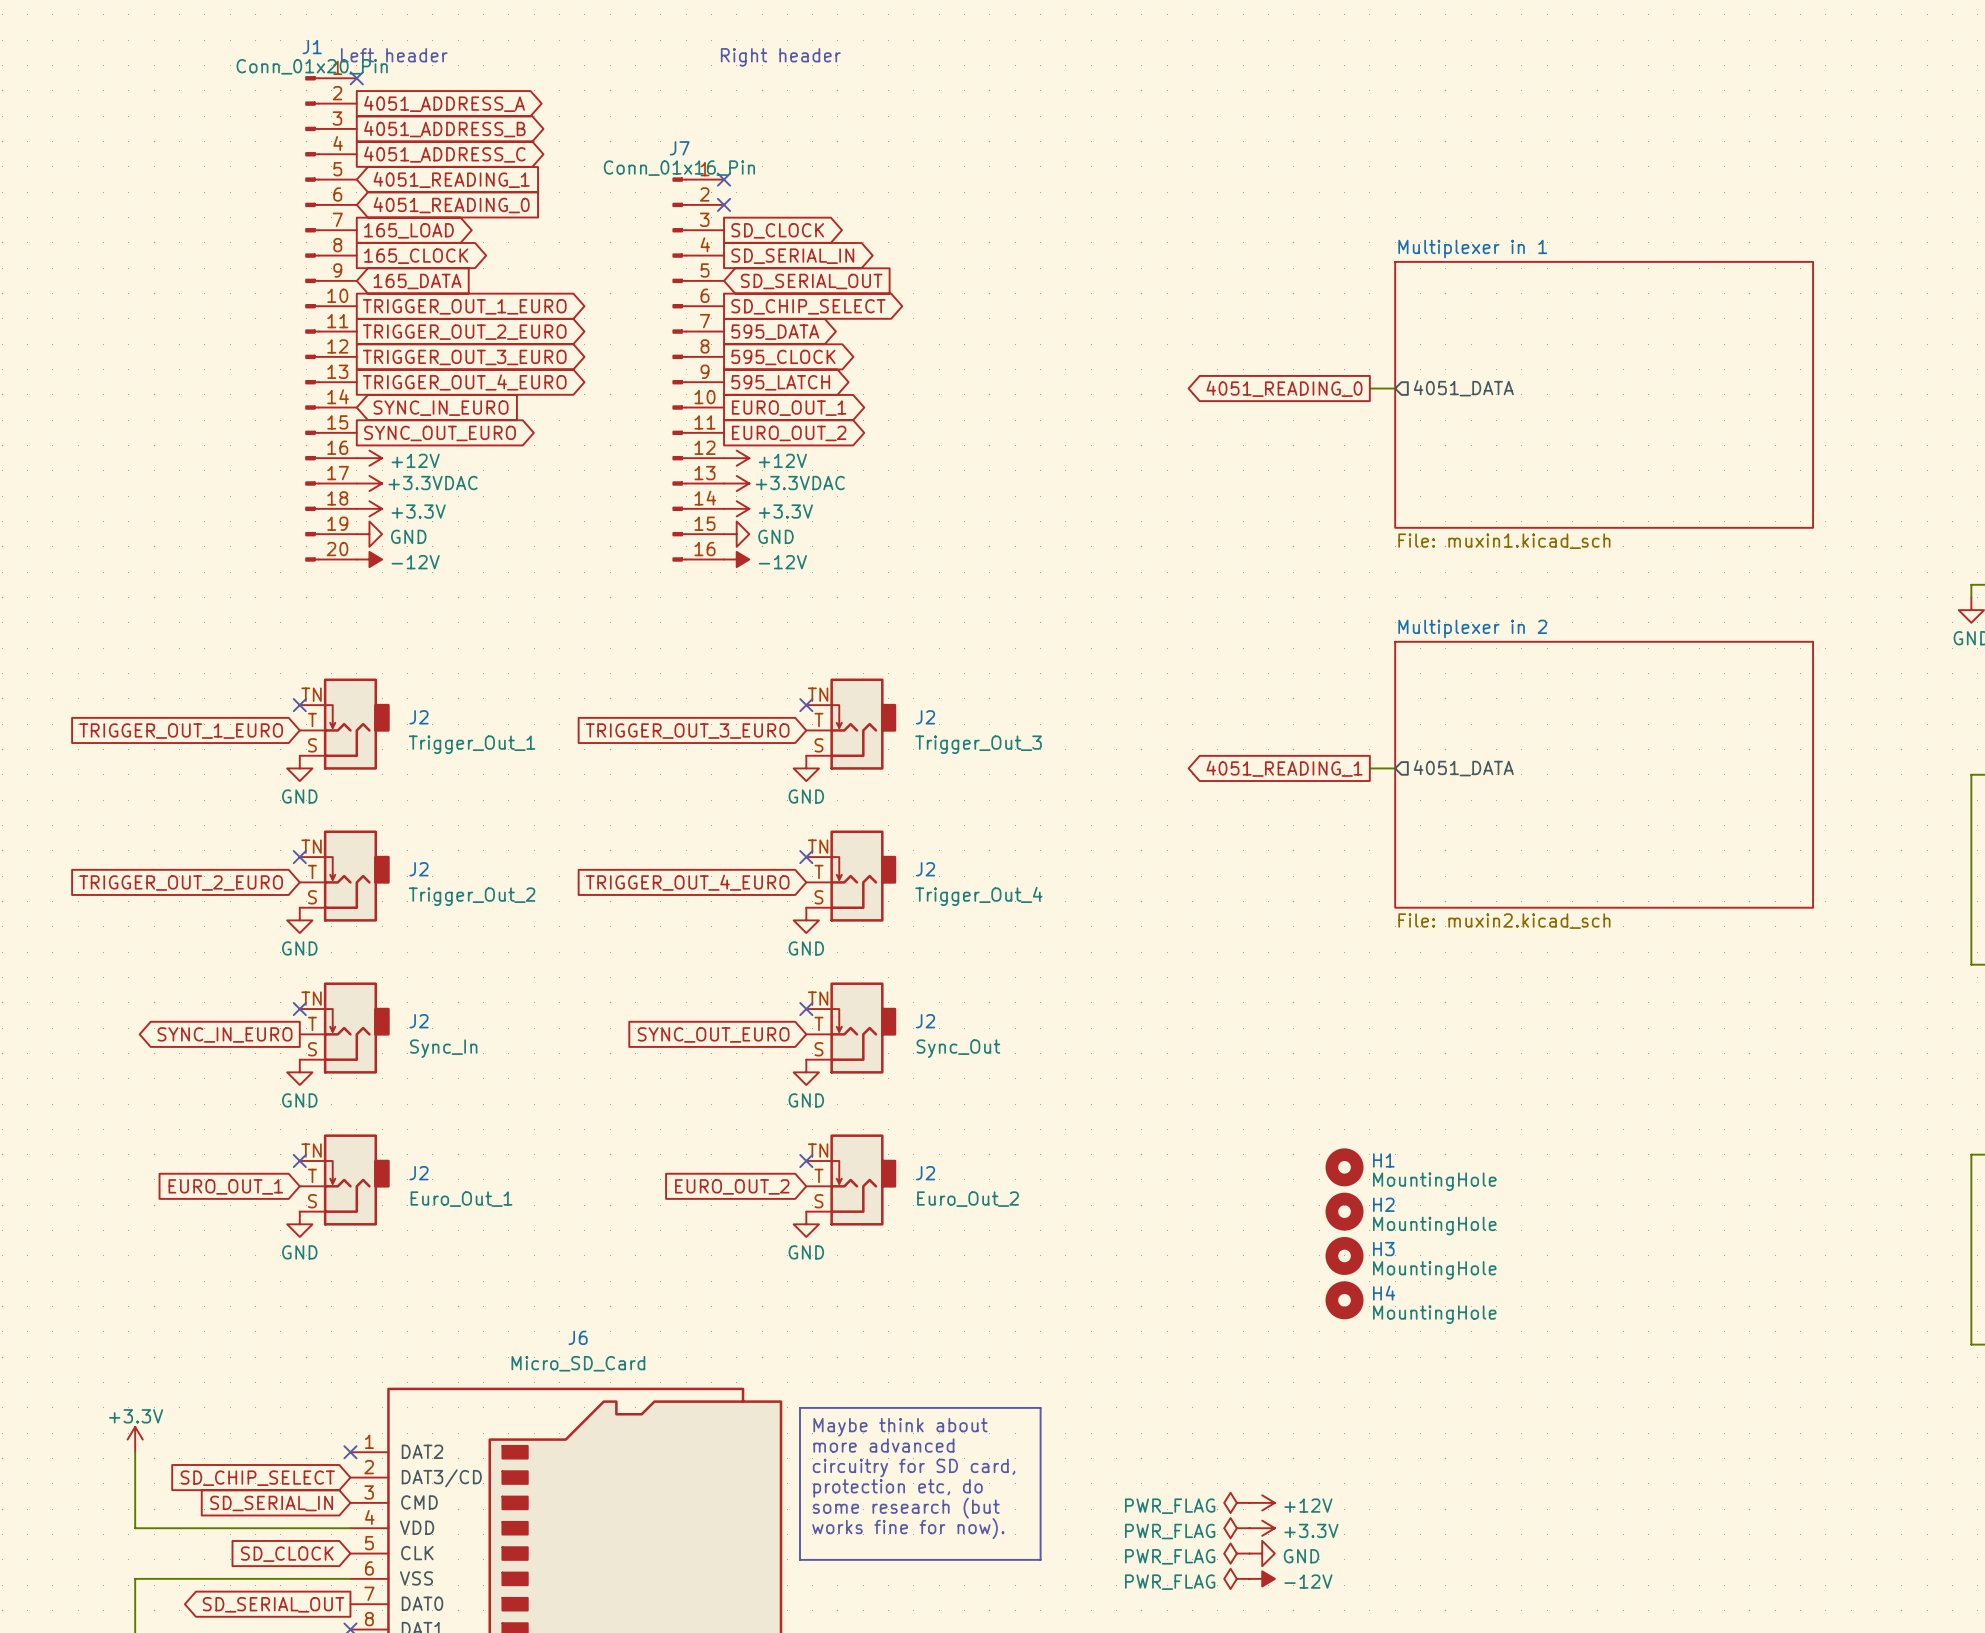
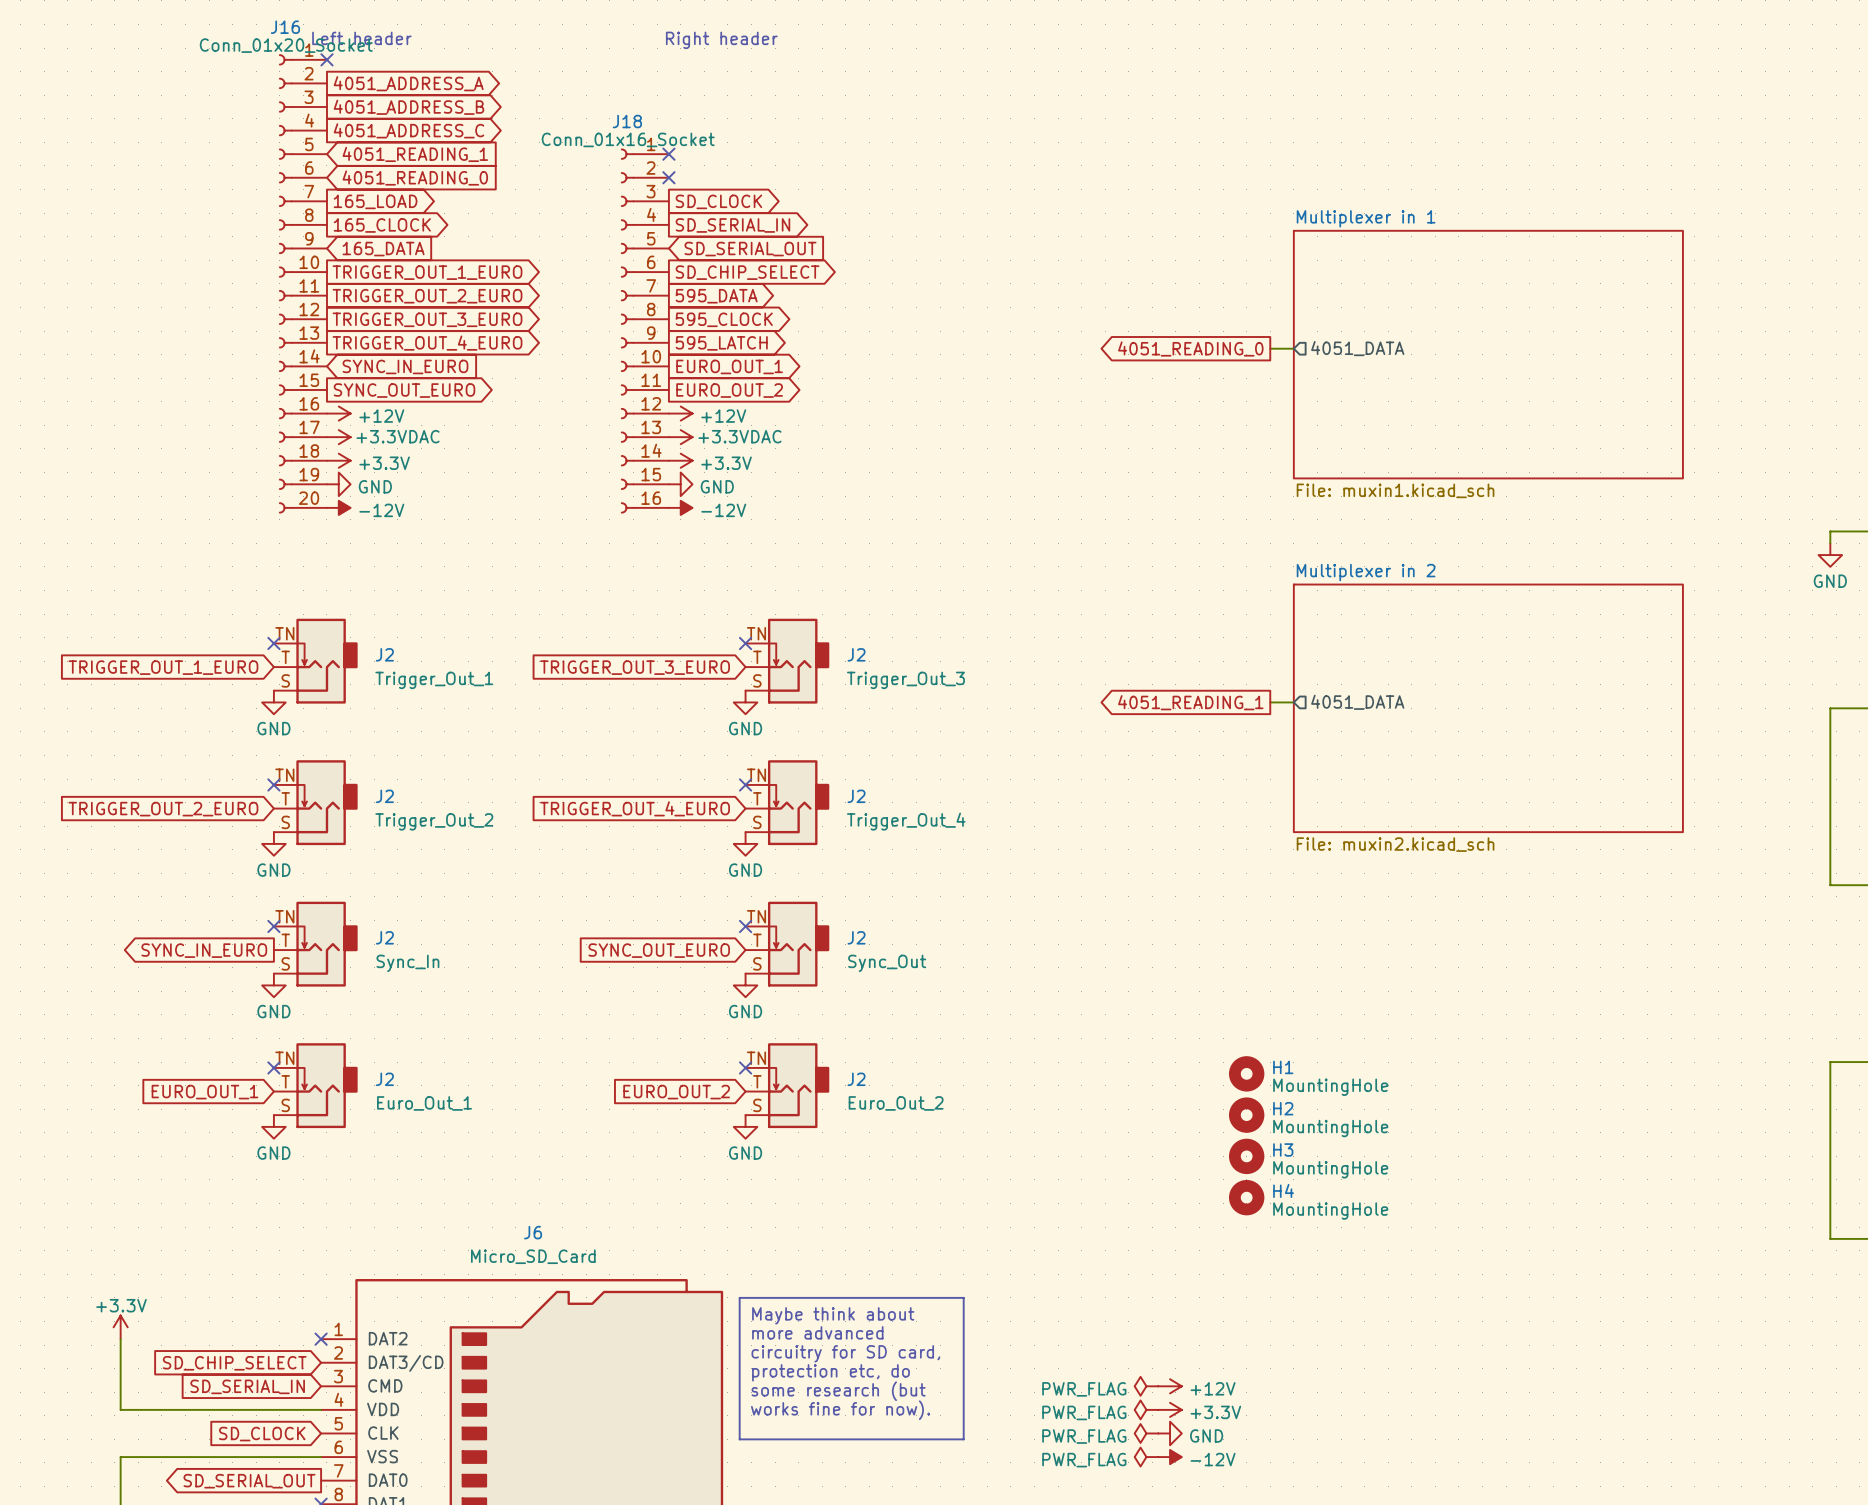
J1: Conn_01x20_Pin (331, 318) -> none
J16: none -> Conn_01x20_Socket (303, 283)
J7: Conn_01x16_Pin (698, 369) -> none
J18: none -> Conn_01x16_Socket (644, 331)

